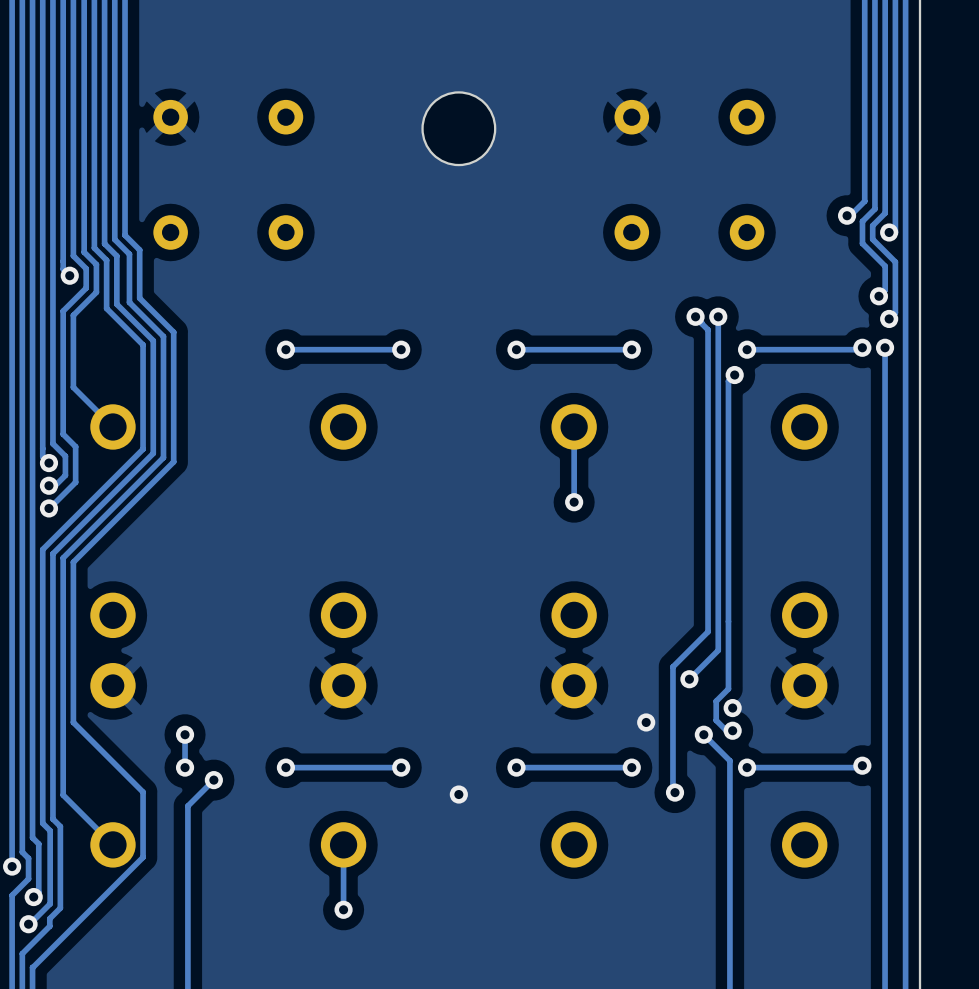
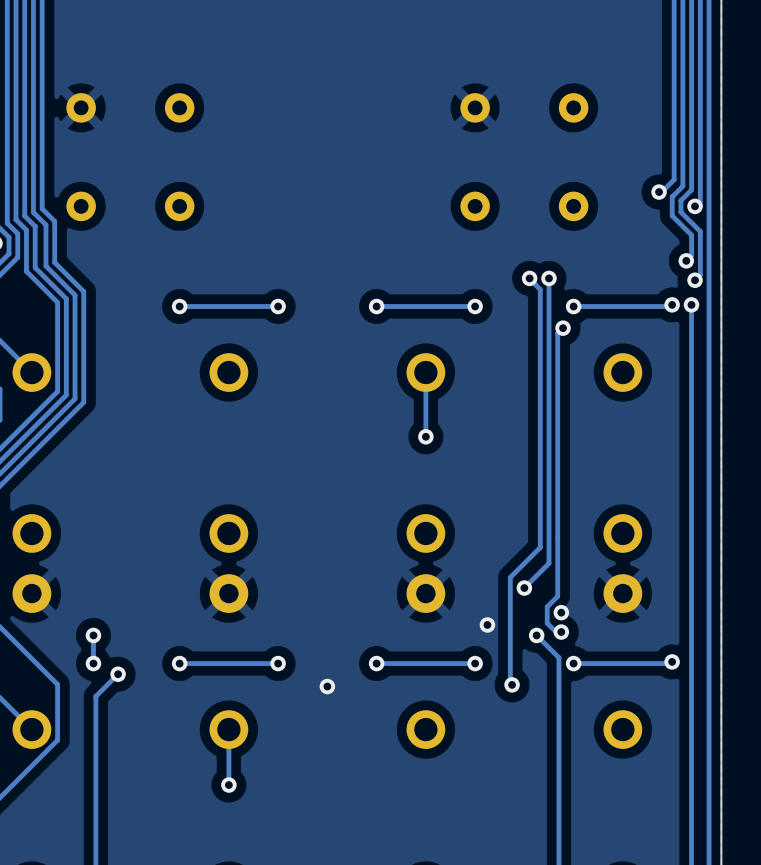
round board edge: [421, 91, 497, 167] -> none

